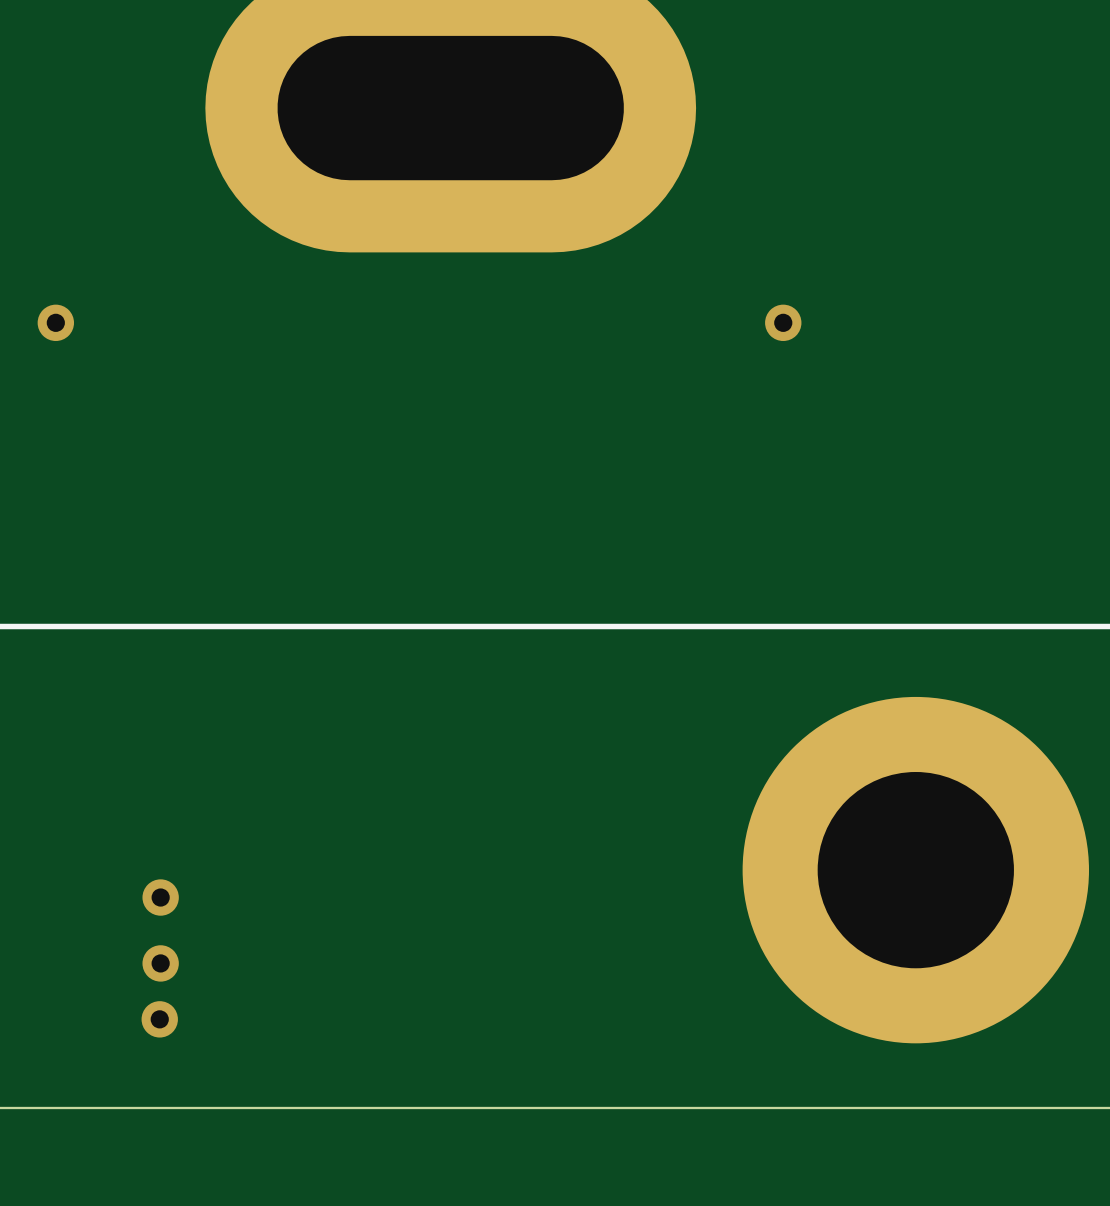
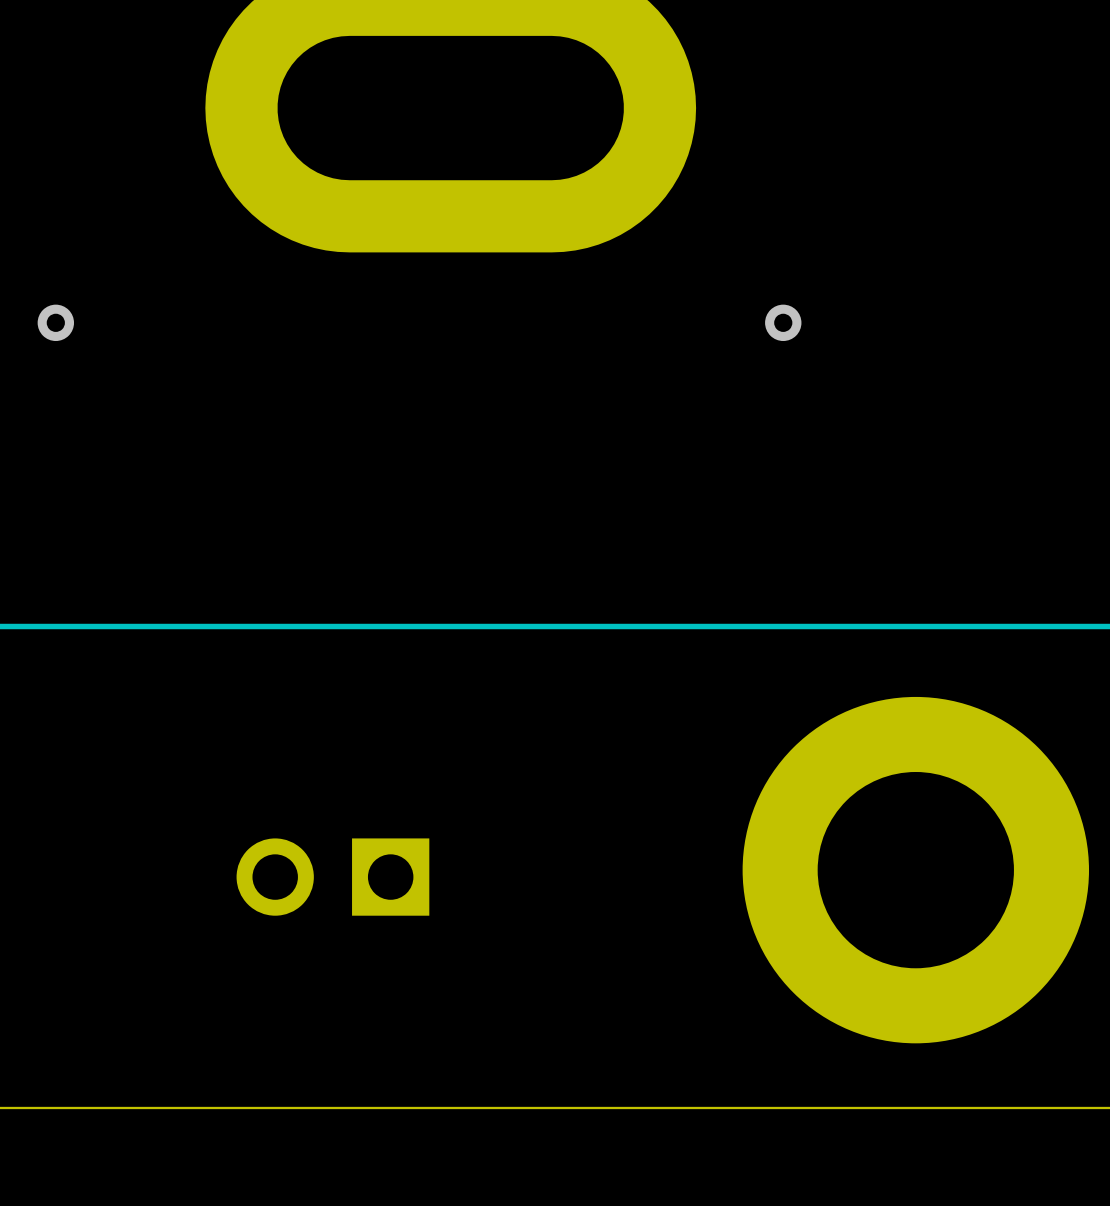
part: none -> (332, 877)
via: (160, 897) -> none
via: (160, 963) -> none
via: (159, 1019) -> none

